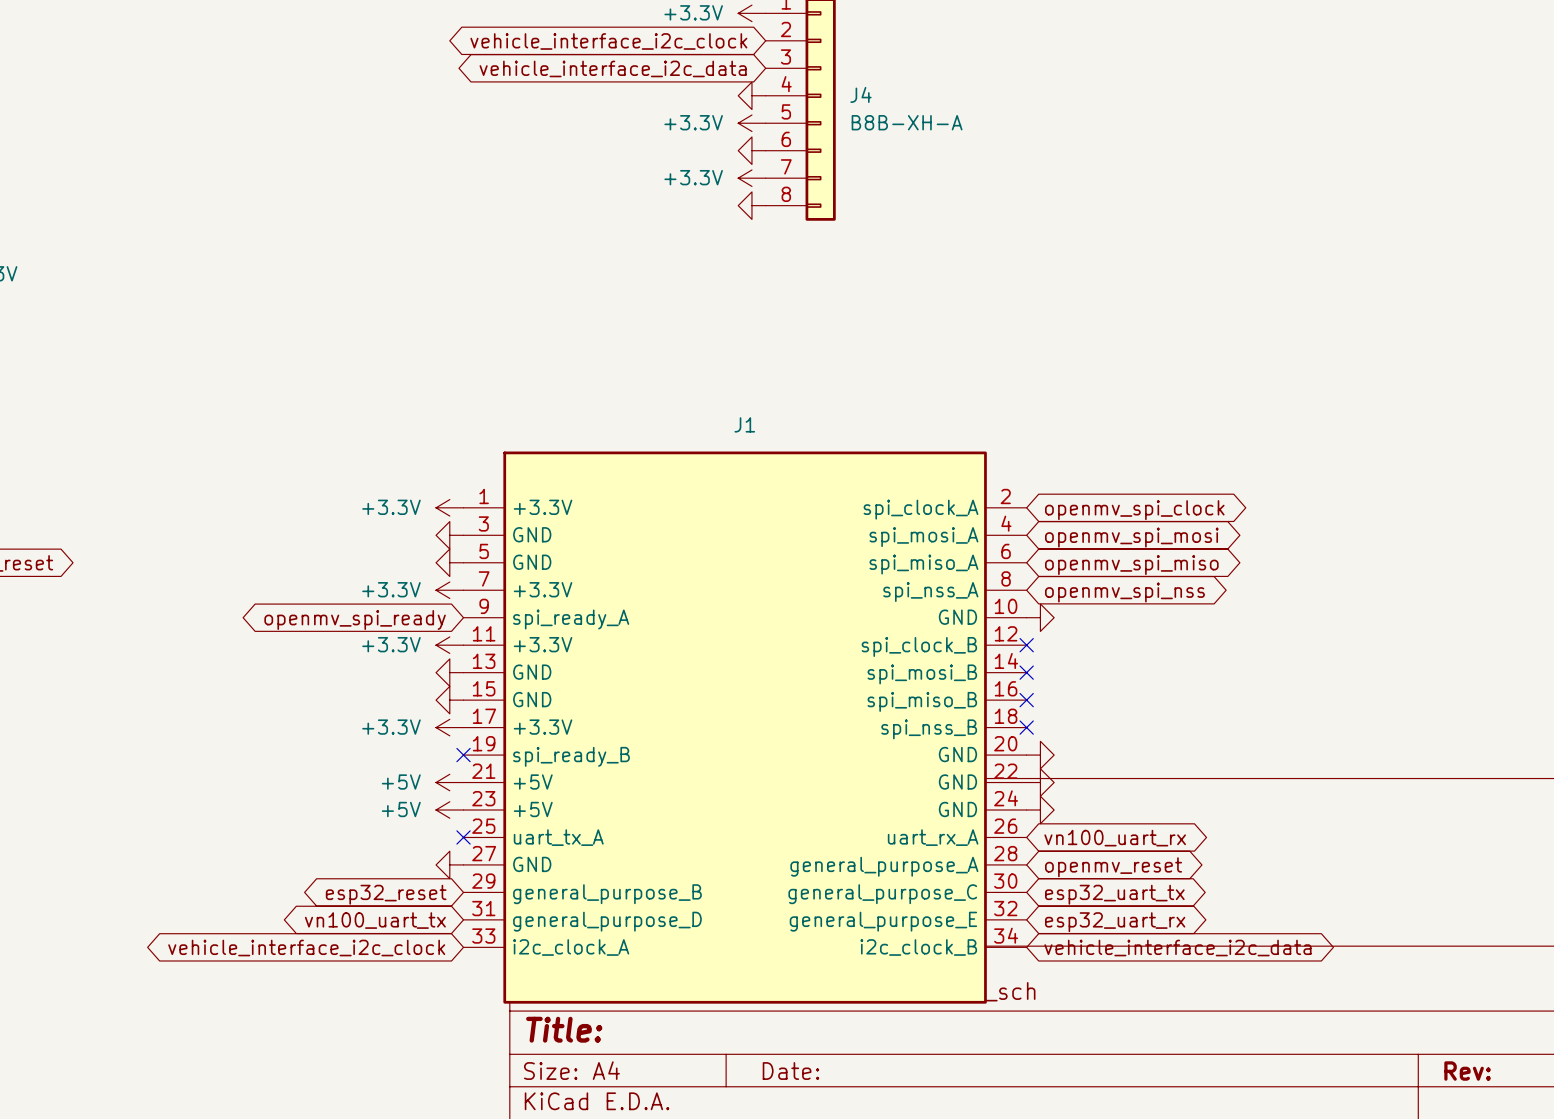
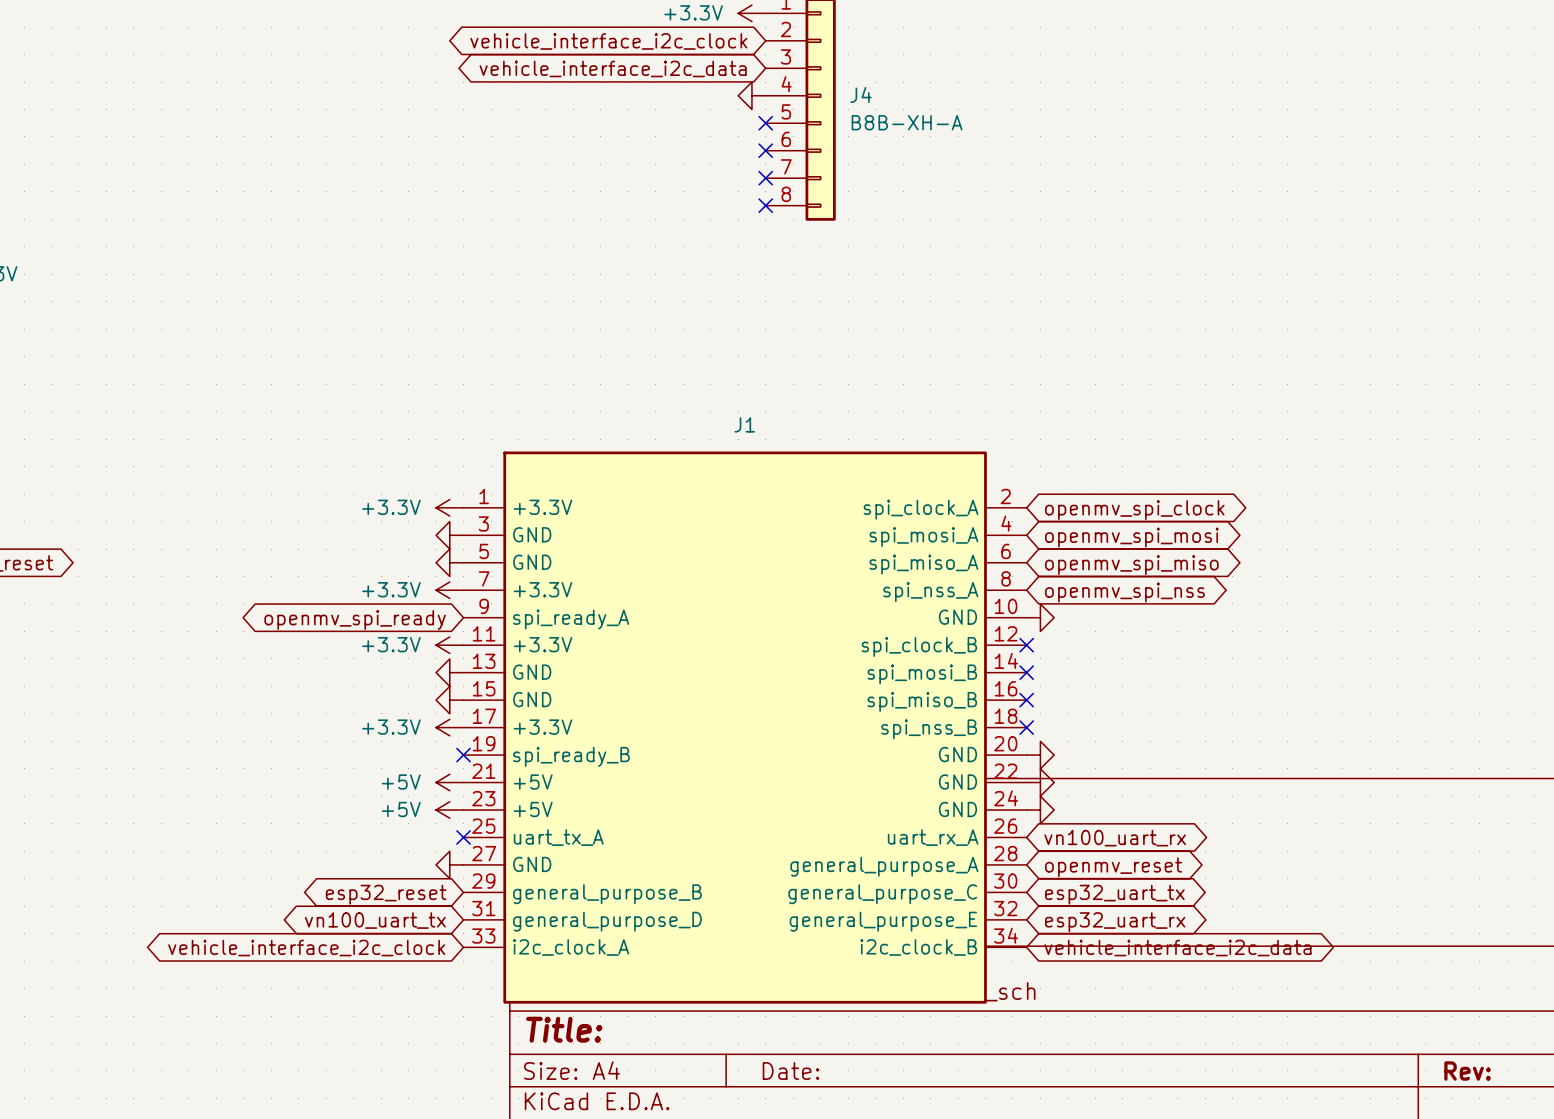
power symbol: +3.3V (751, 123) -> none
no-connect mark: none -> (765, 123)
power symbol: (751, 150) -> none
no-connect mark: none -> (765, 150)
power symbol: +3.3V (751, 178) -> none
no-connect mark: none -> (765, 178)
power symbol: (751, 205) -> none
no-connect mark: none -> (765, 205)

